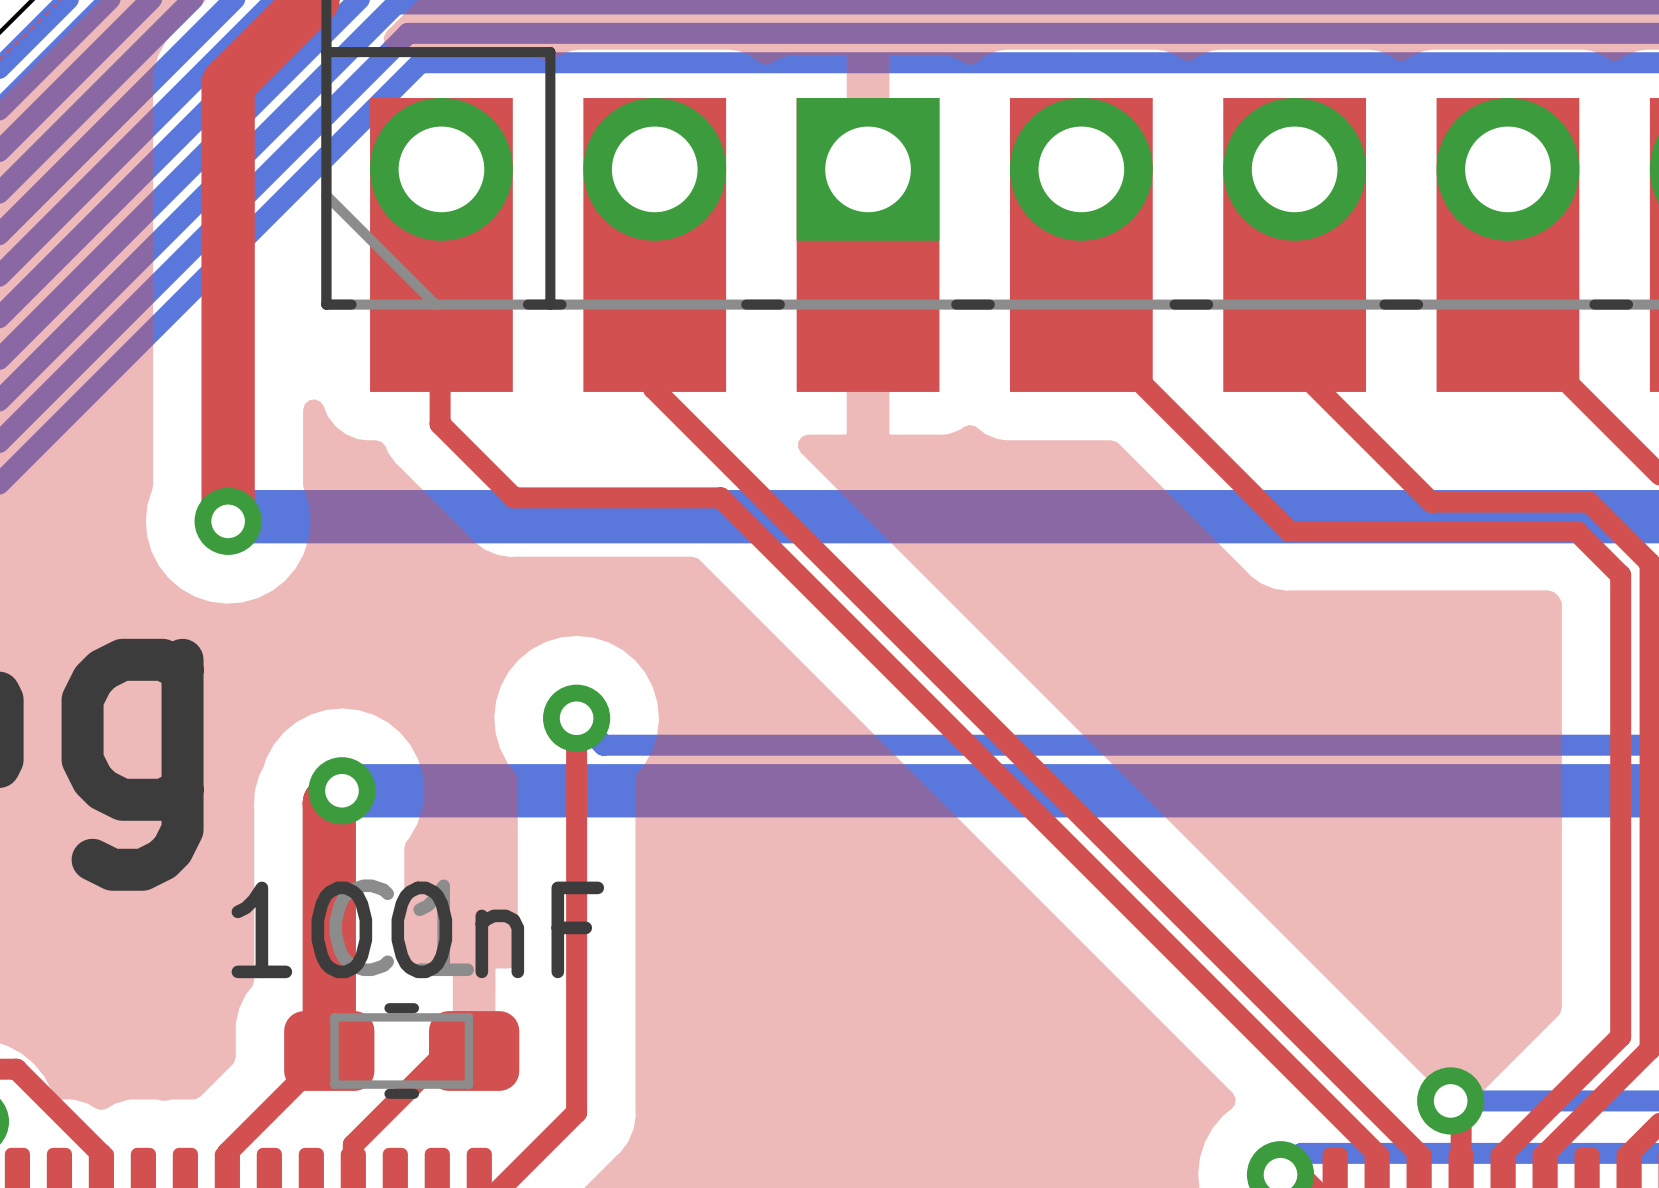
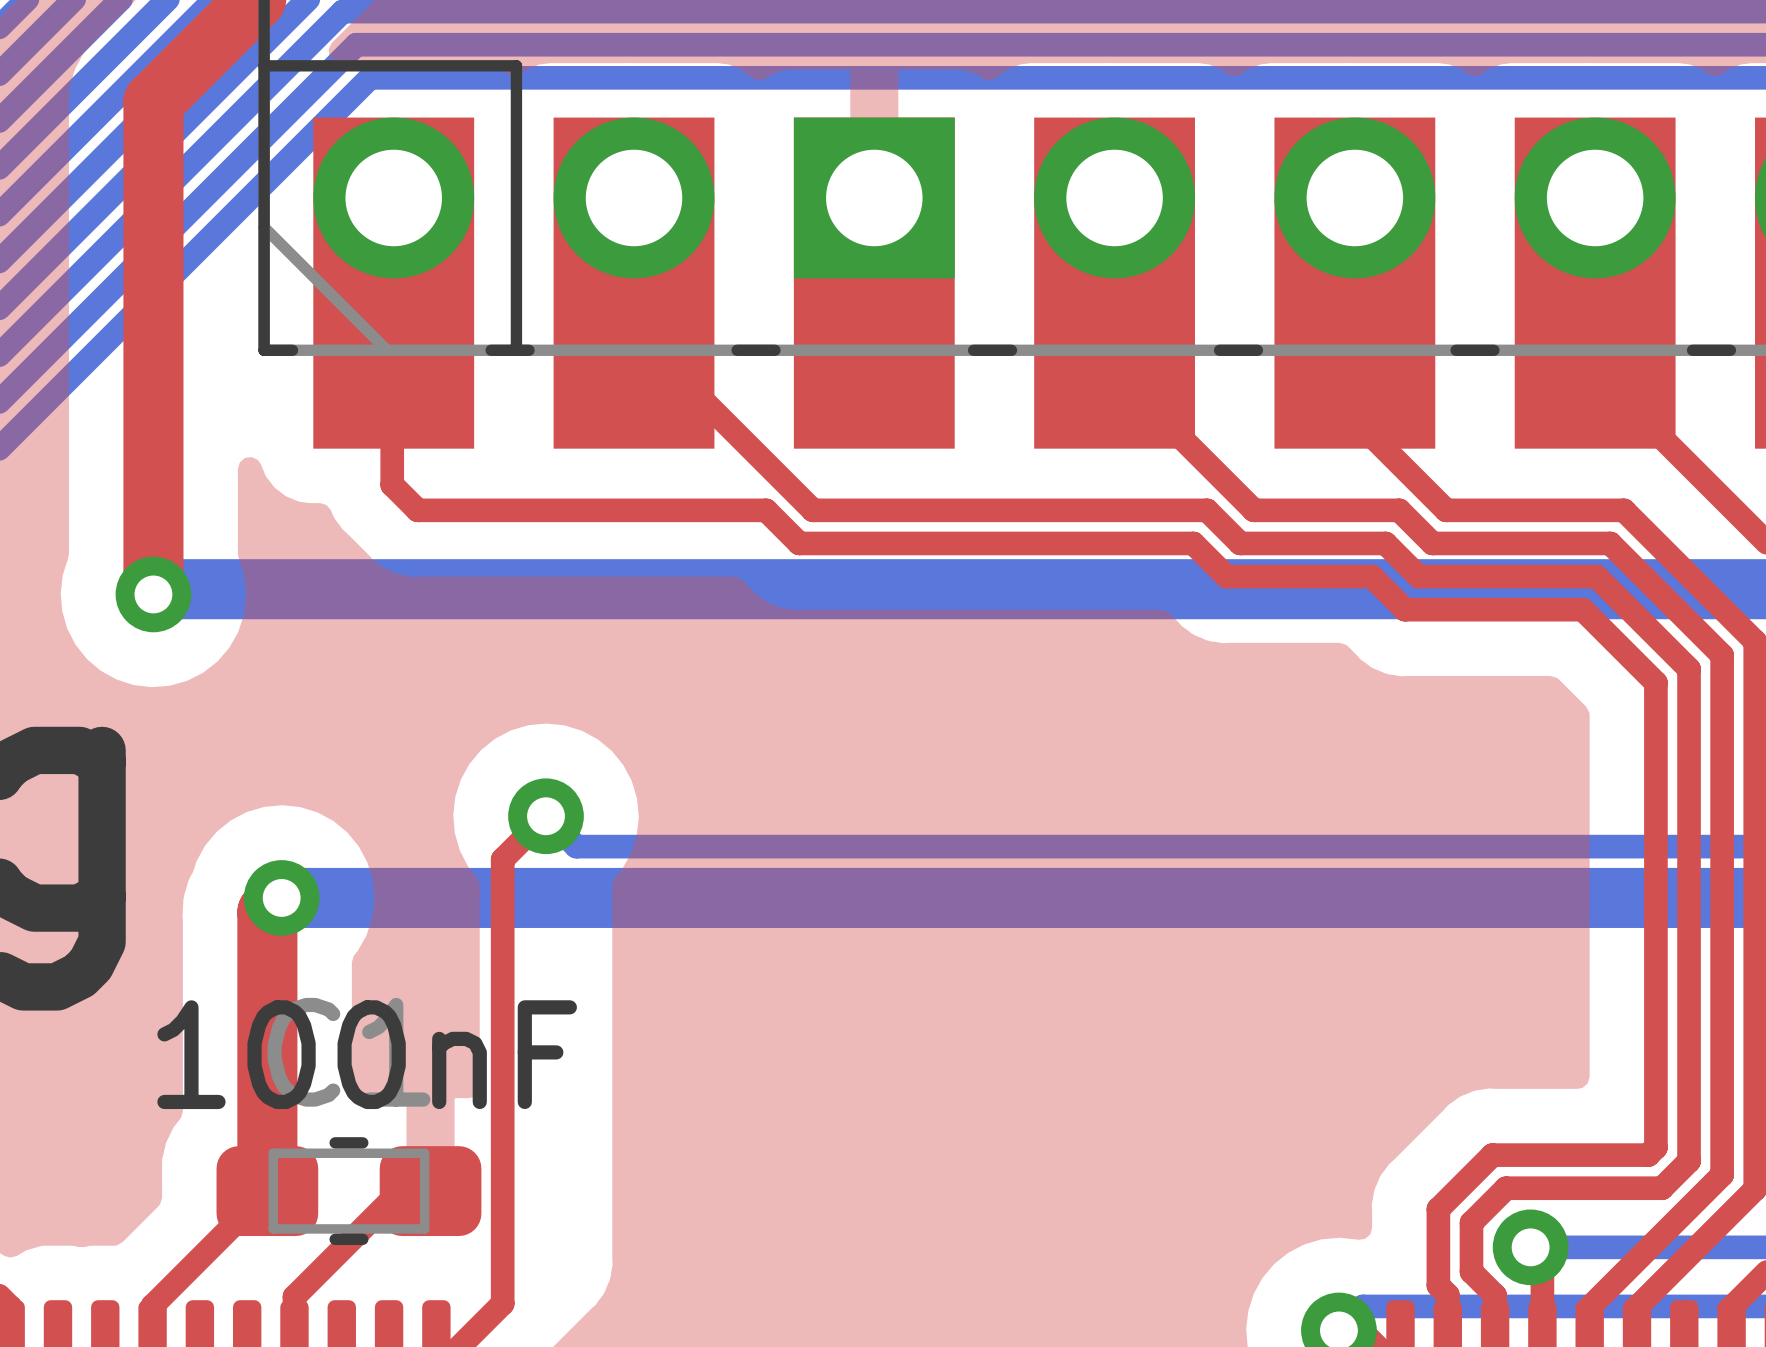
top track: (653, 286) (653, 388) (1419, 1154) -> (632, 329) (813, 510) (1207, 510) (1240, 543) (1385, 543) (1418, 576) (1596, 576) (1689, 669) (1689, 1161) (1662, 1188) (1506, 1188) (1471, 1222) (1471, 1271) (1495, 1295) (1495, 1307)
top track: (462, 446) (513, 497) (720, 497) (1377, 1154) -> (417, 510) (766, 510) (799, 543) (1193, 543) (1226, 576) (1371, 576) (1405, 609) (1582, 609) (1655, 682) (1655, 1147) (1648, 1155) (1492, 1155) (1438, 1209) (1438, 1285) (1447, 1294) (1447, 1307)
top track: (1205, 446) (1289, 531) (1576, 531) -> (1253, 510) (1399, 510) (1432, 543) (1610, 543) (1672, 605)
top track: (1375, 446) (1431, 502) (1589, 502) -> (1446, 510) (1623, 510) (1686, 572)
top track: (576, 718) (576, 1112) (538, 1150) -> (546, 816) (502, 859) (502, 1303)

